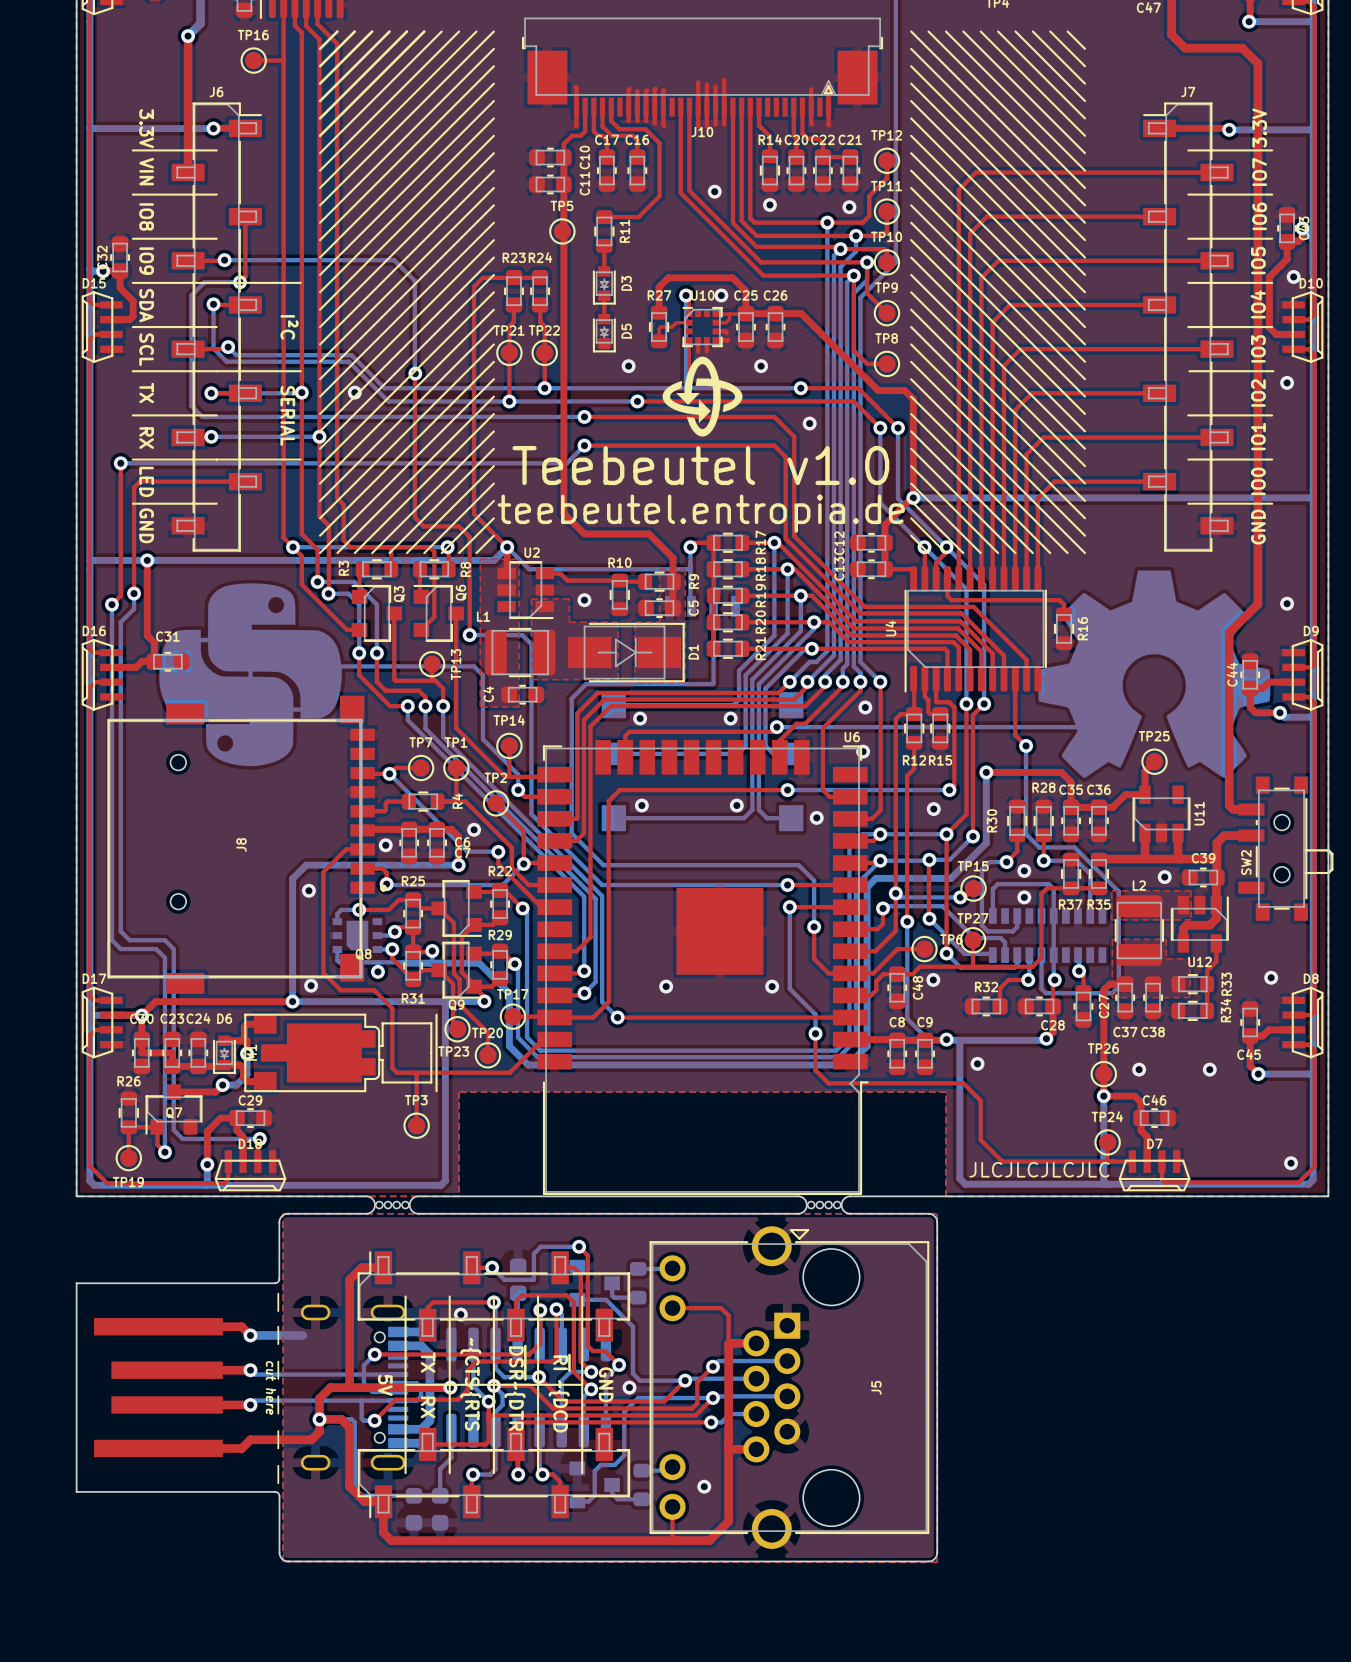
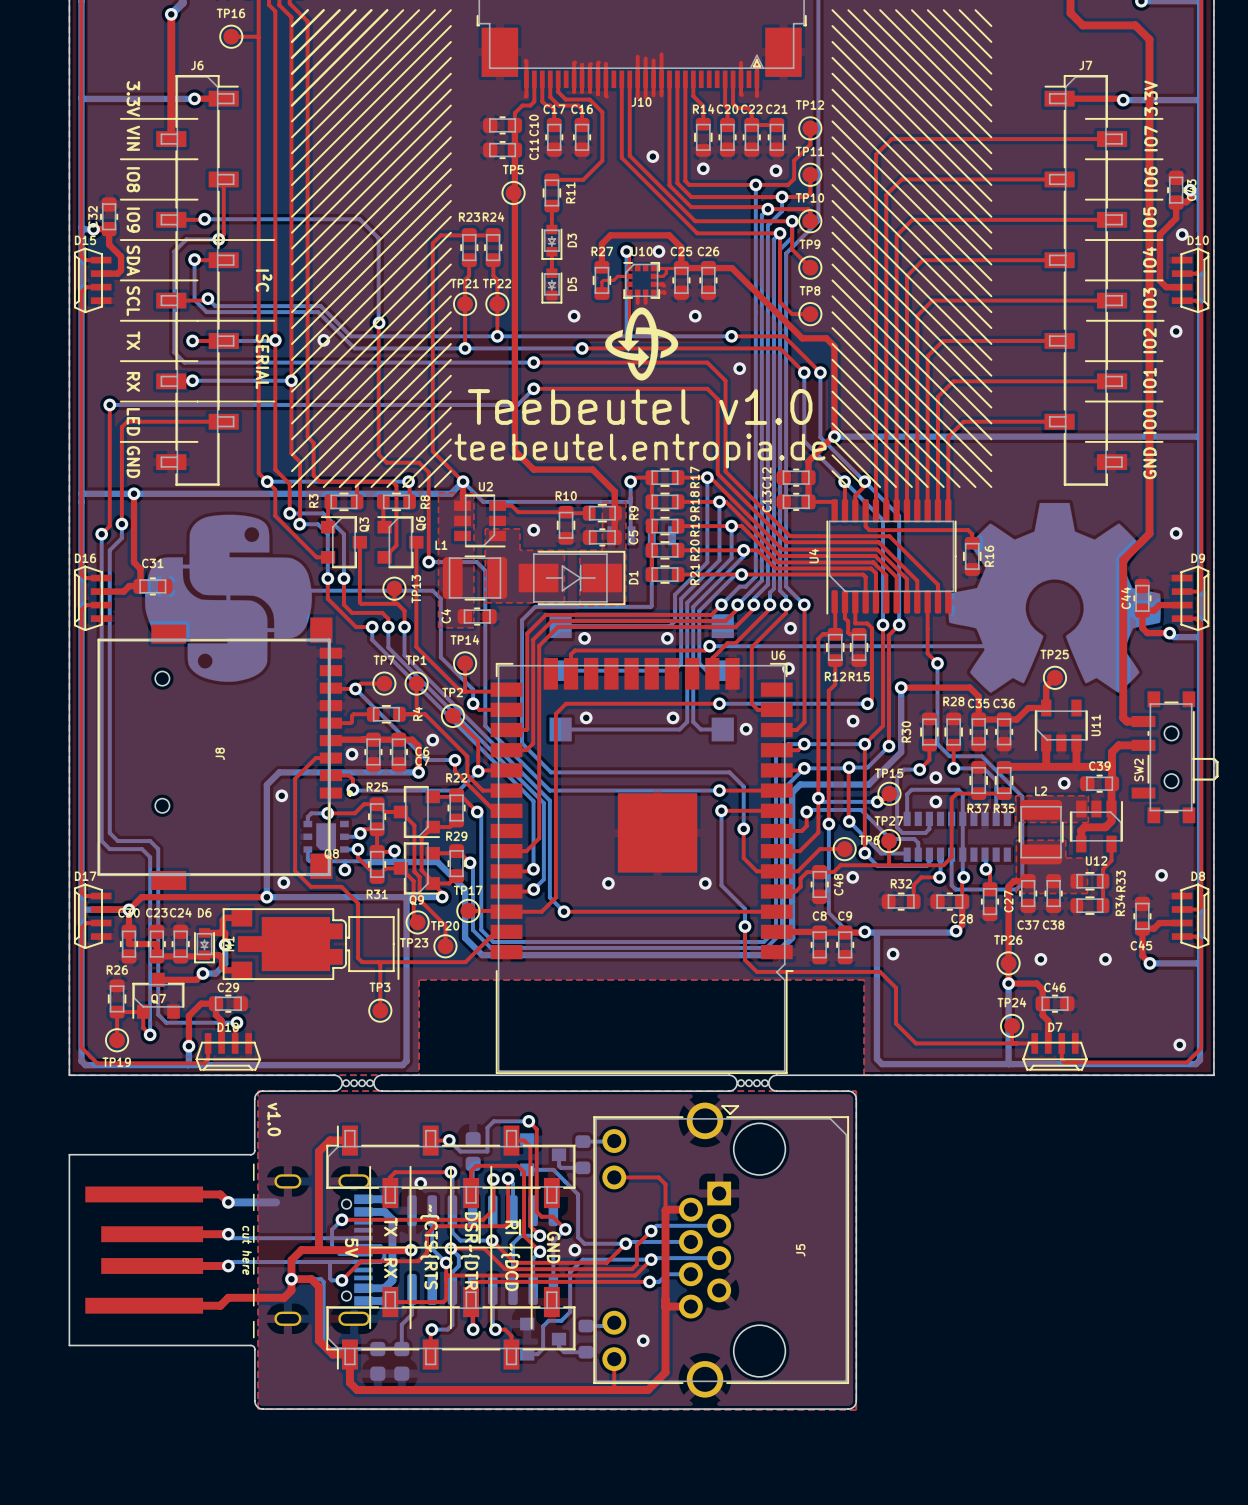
text: JLCJLCJLCJLC (1039, 1169) -> none
text: none -> v1.0 (274, 1119)

